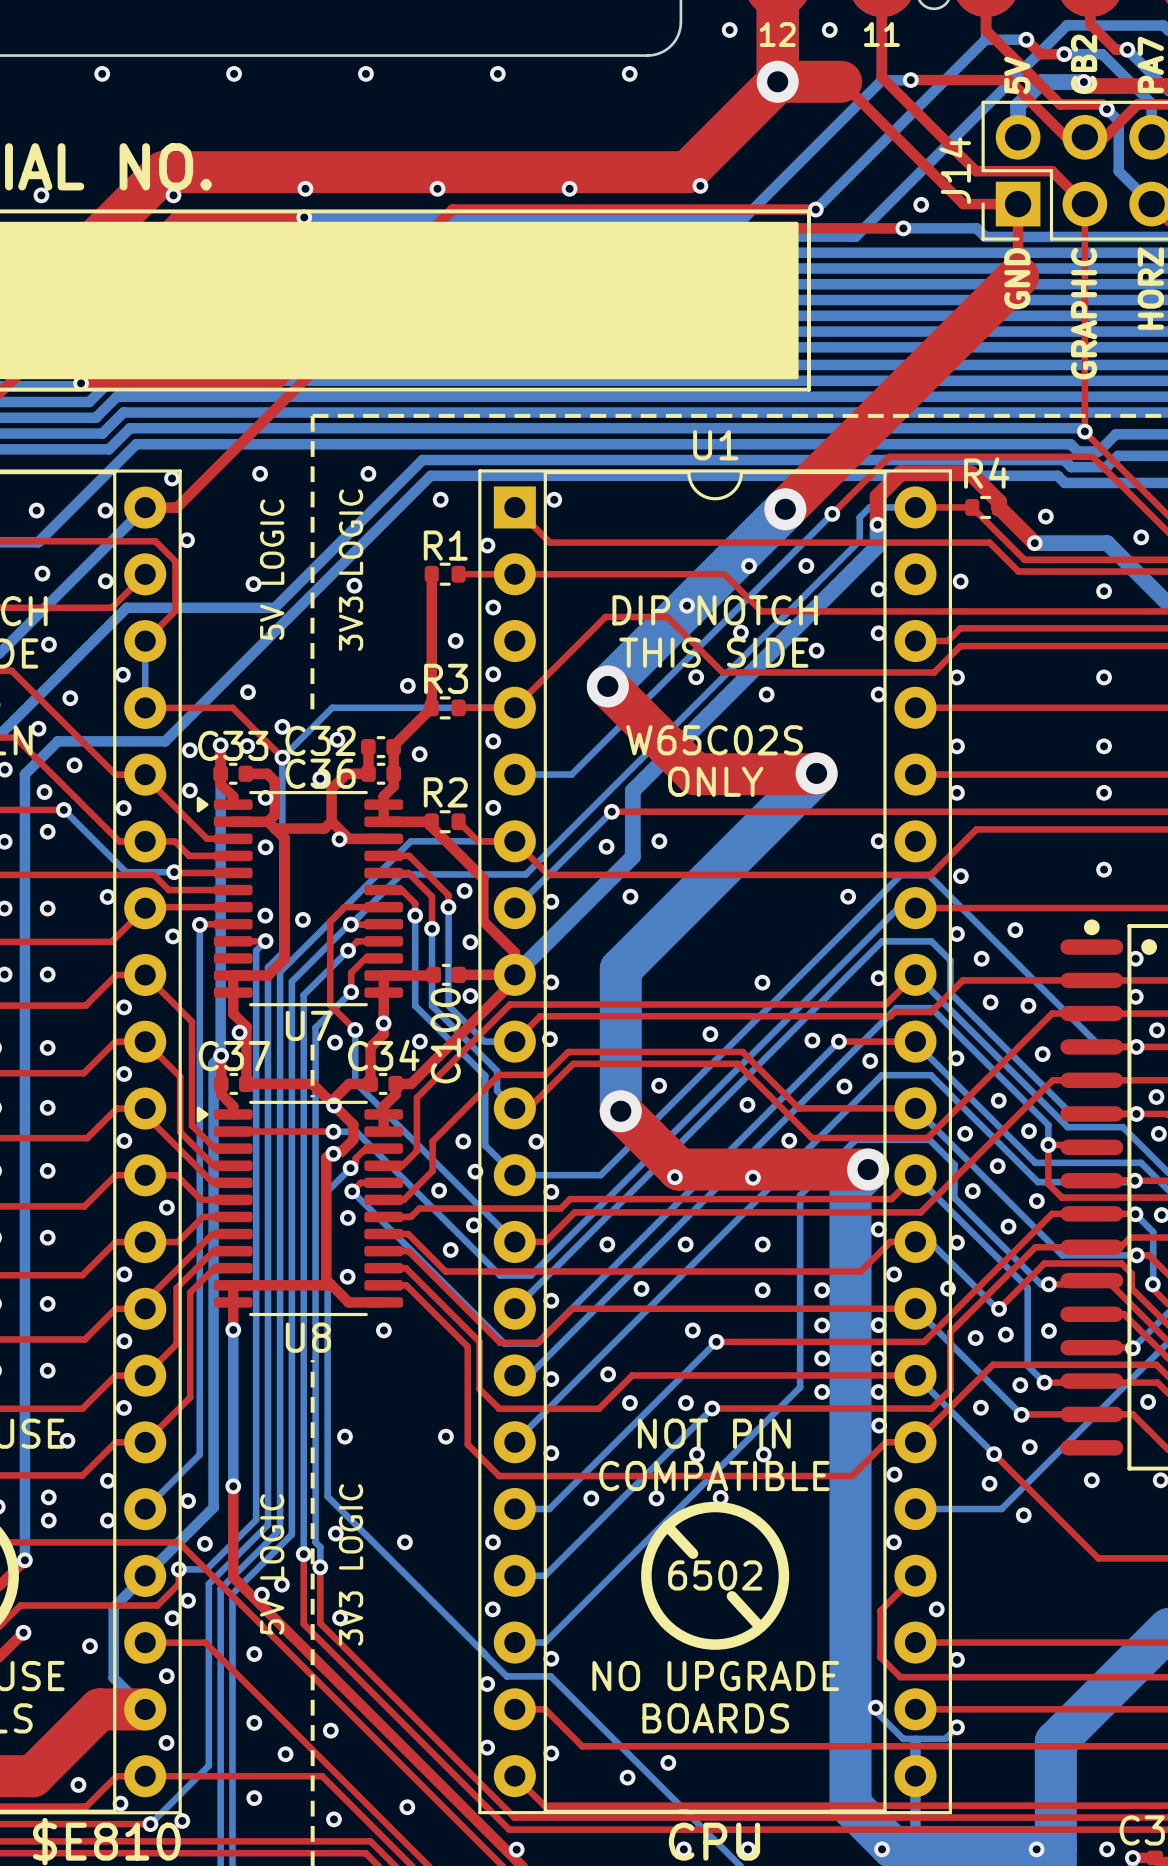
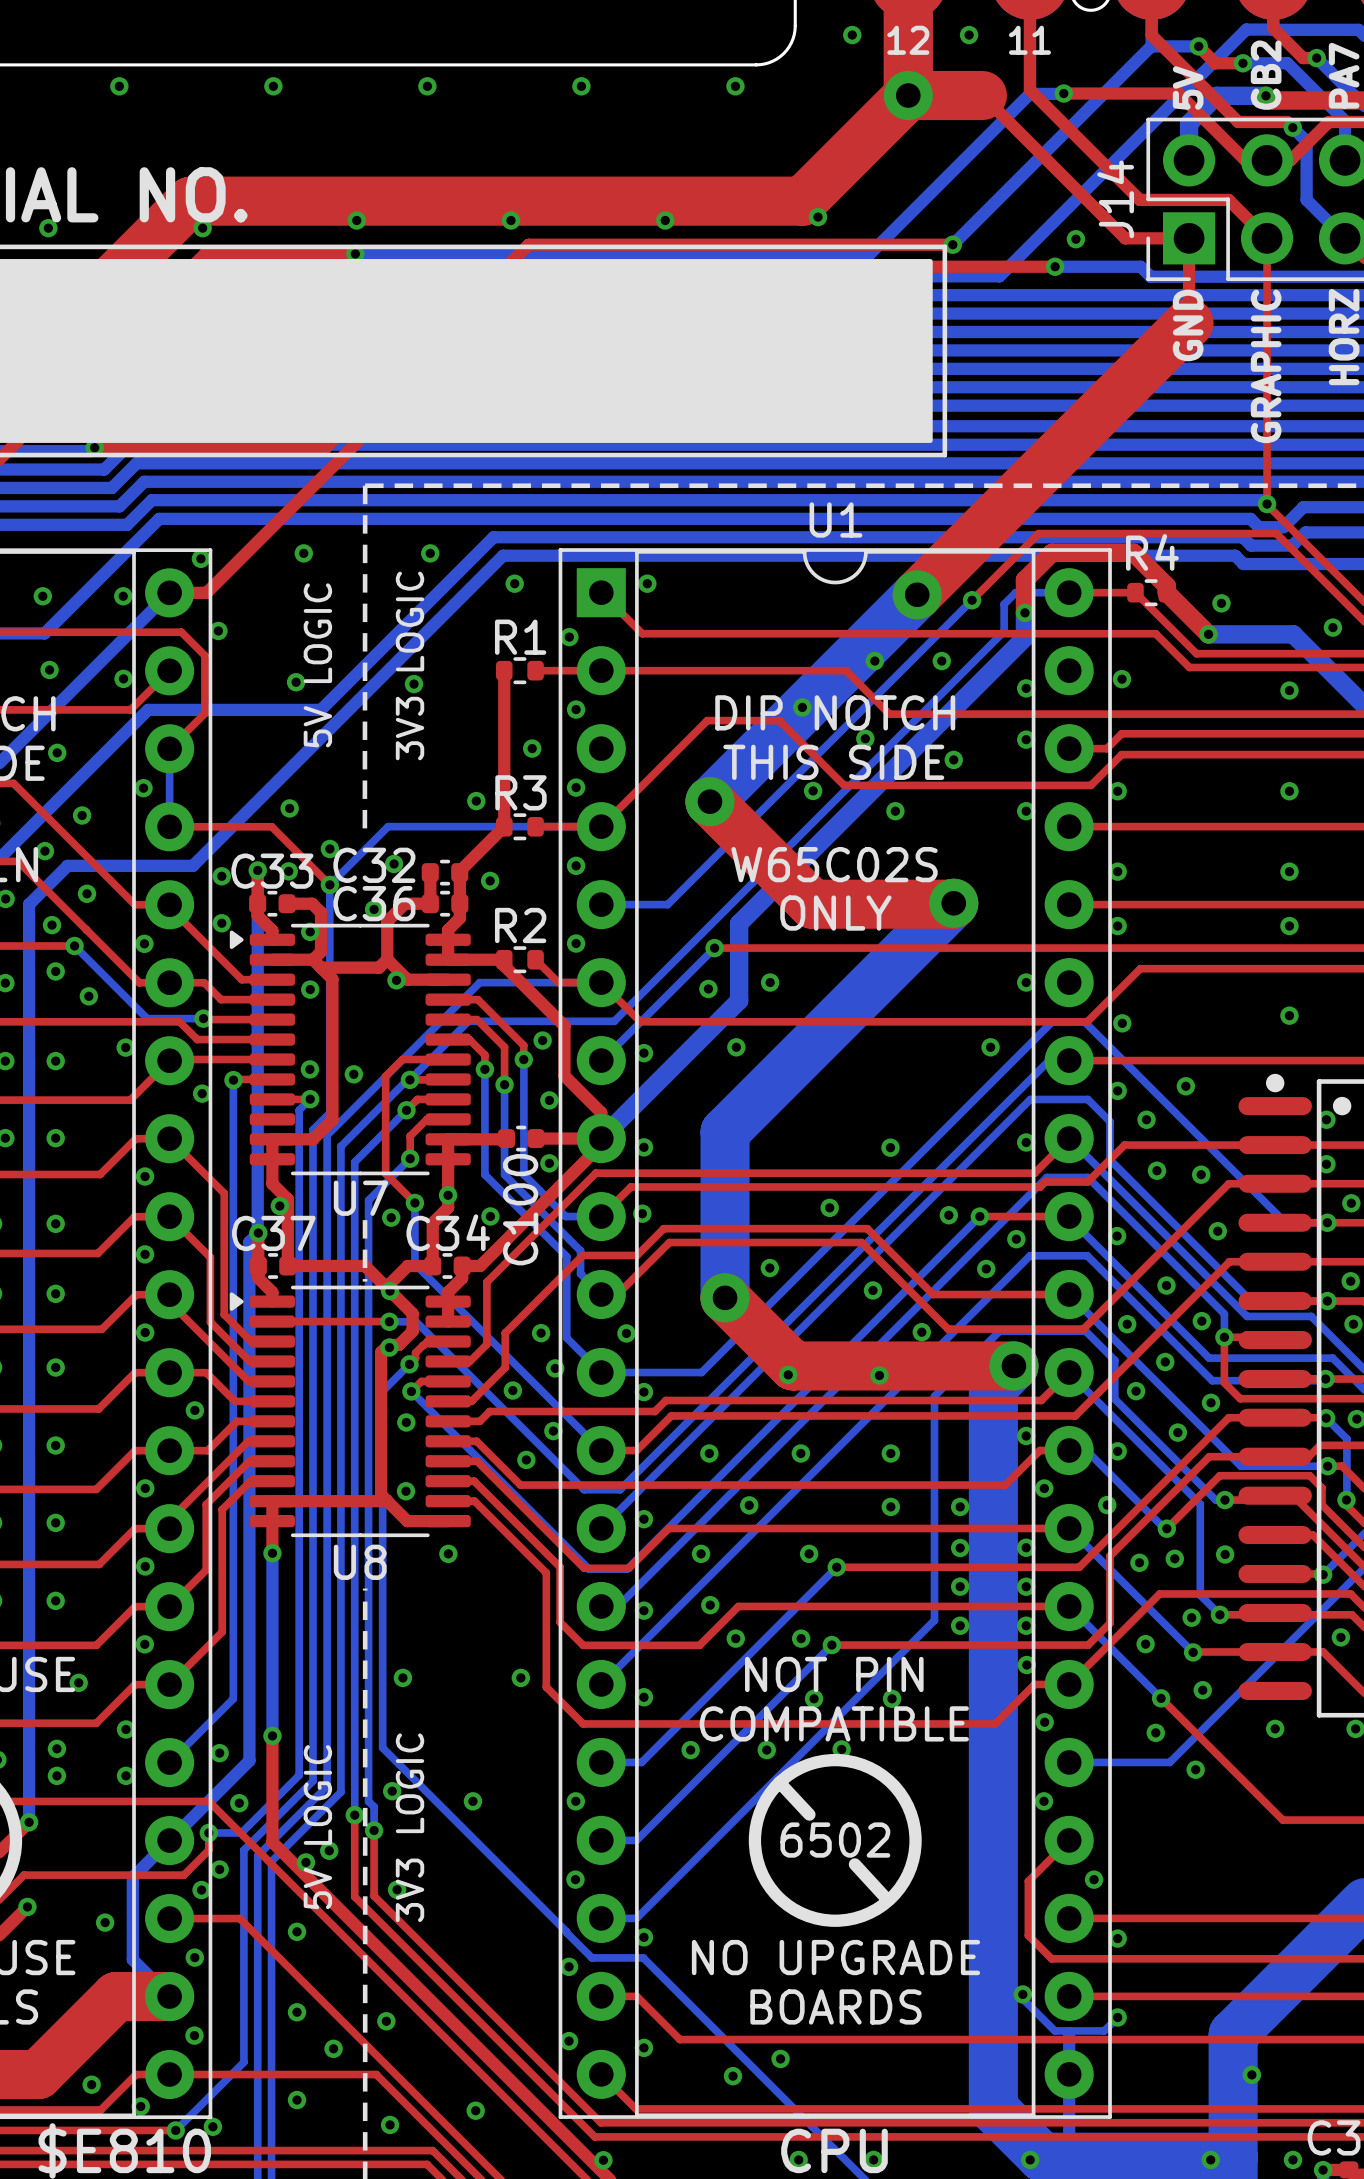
via: none -> (88, 996)
via: none -> (701, 1553)
via: none -> (1251, 2074)

